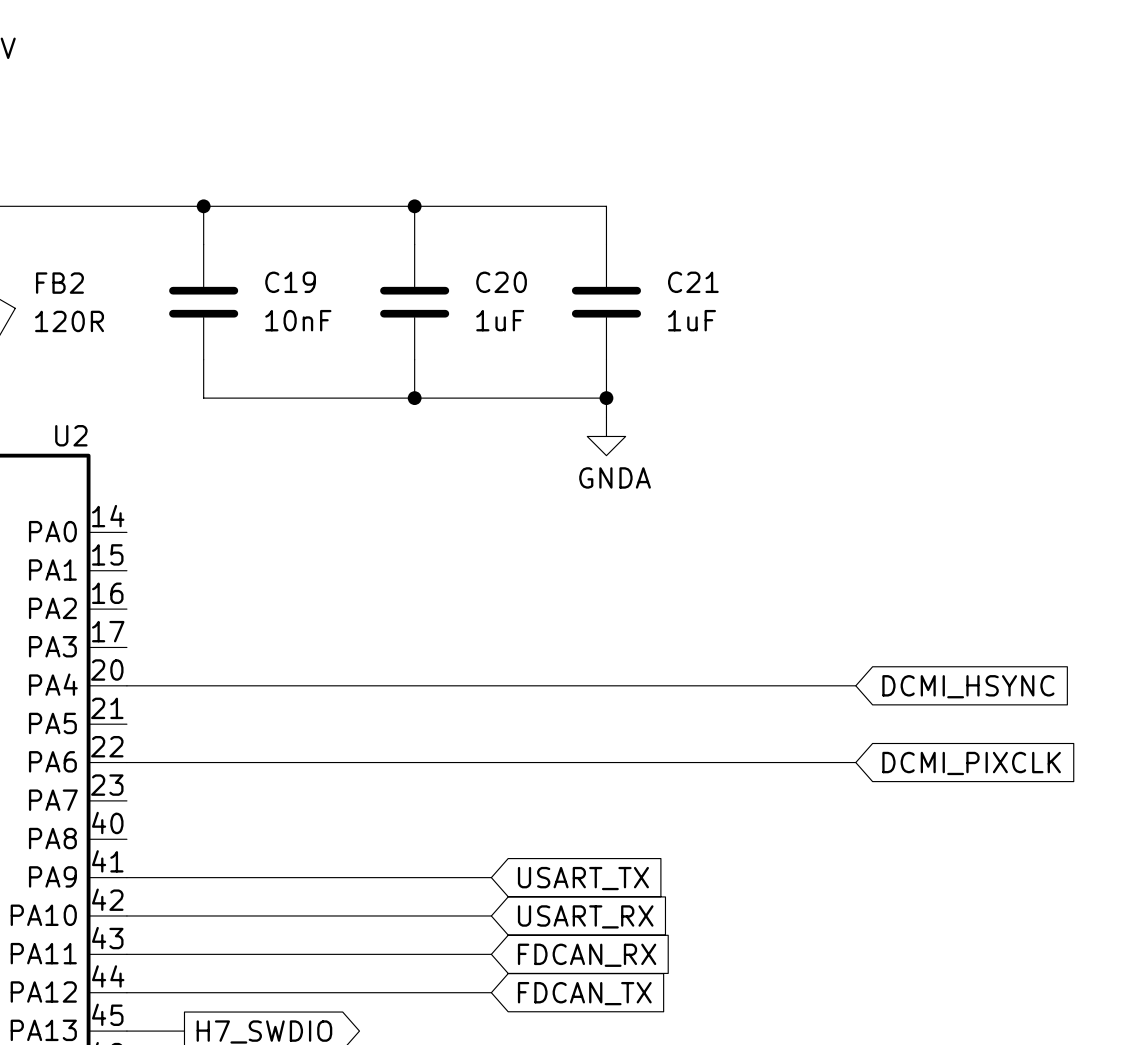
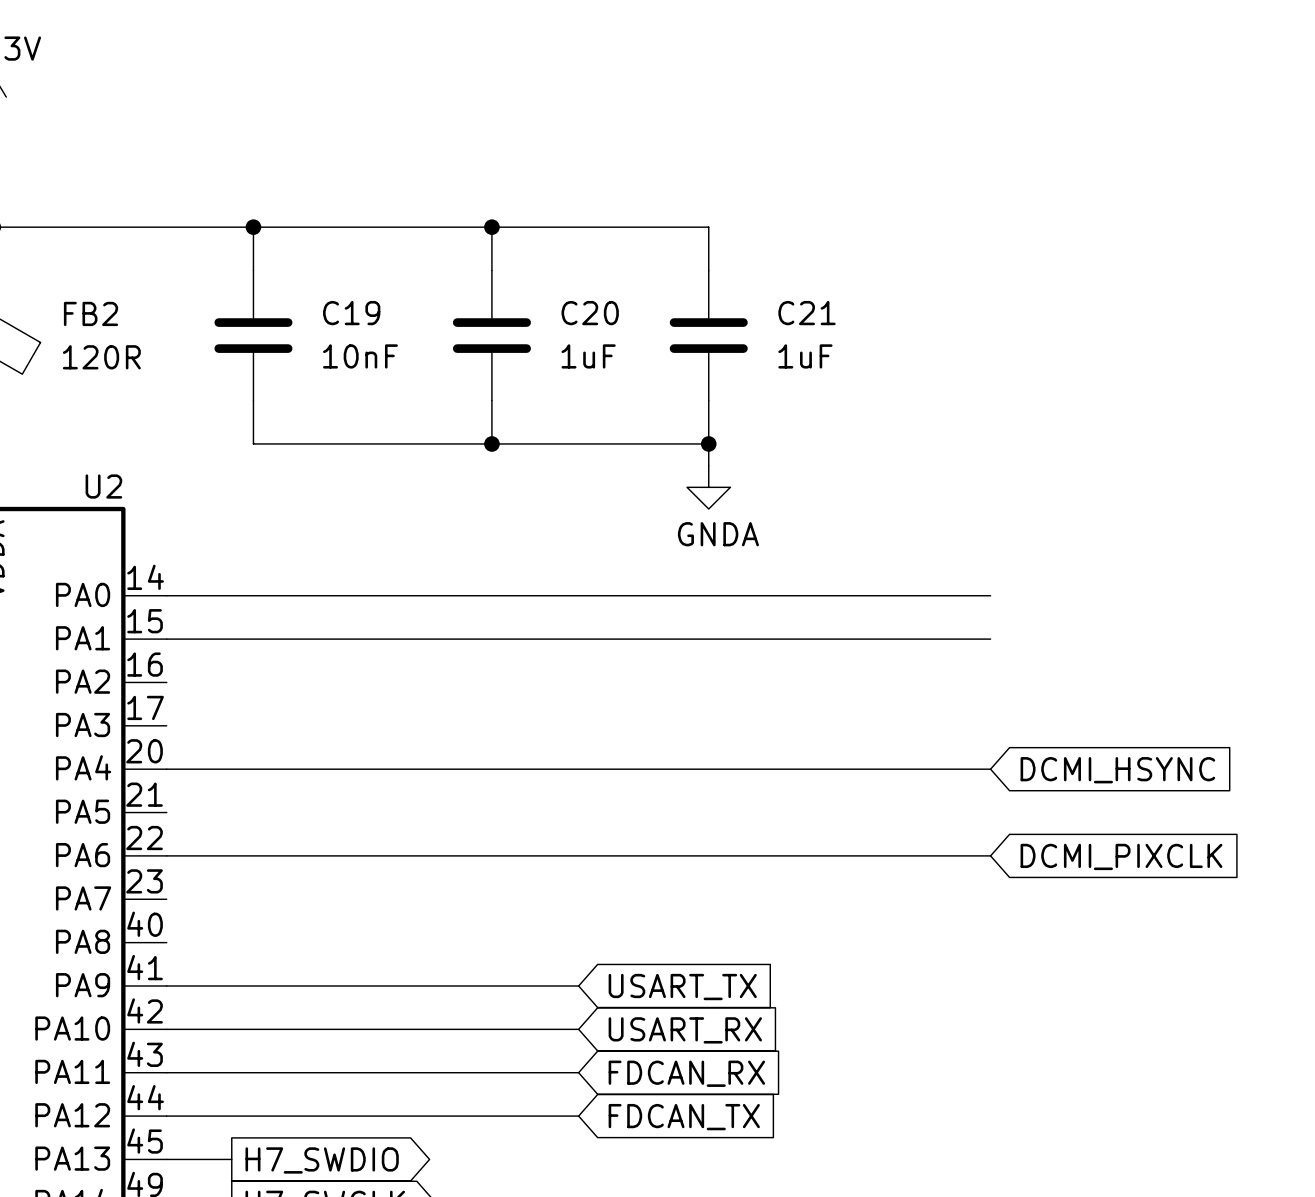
wire: none -> (166, 595) (990, 595)
wire: none -> (166, 639) (990, 639)

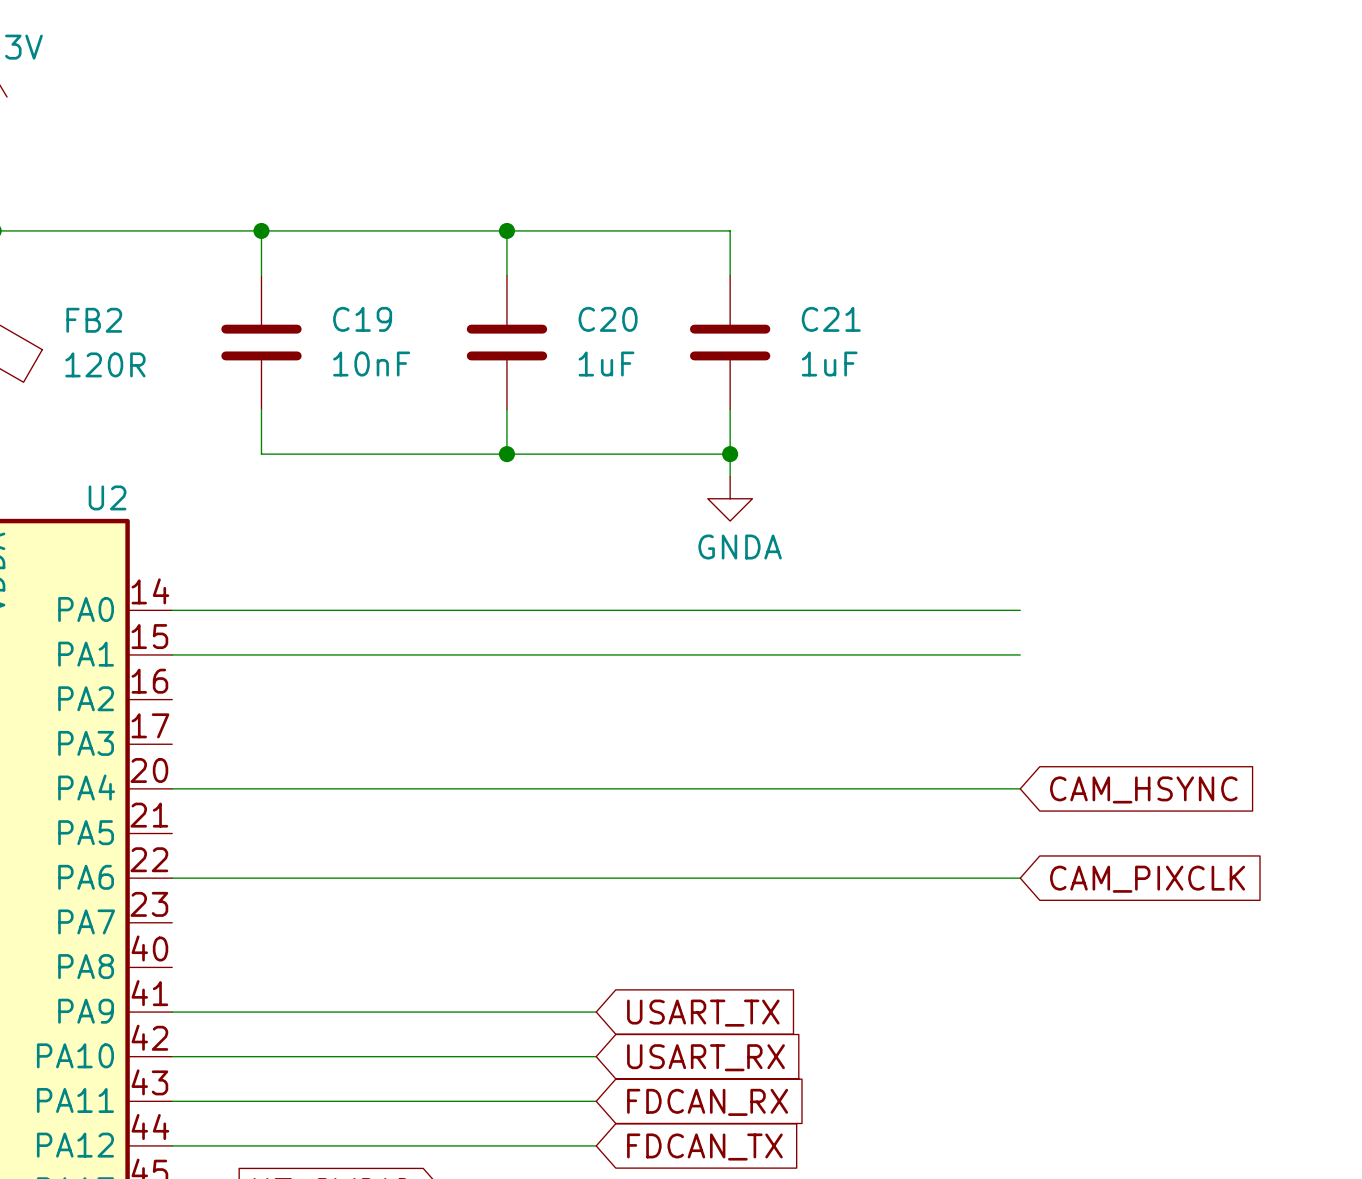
global label: DCMI_HSYNC (1117, 770) -> CAM_HSYNC (1143, 789)
global label: DCMI_PIXCLK (1121, 856) -> CAM_PIXCLK (1147, 879)

